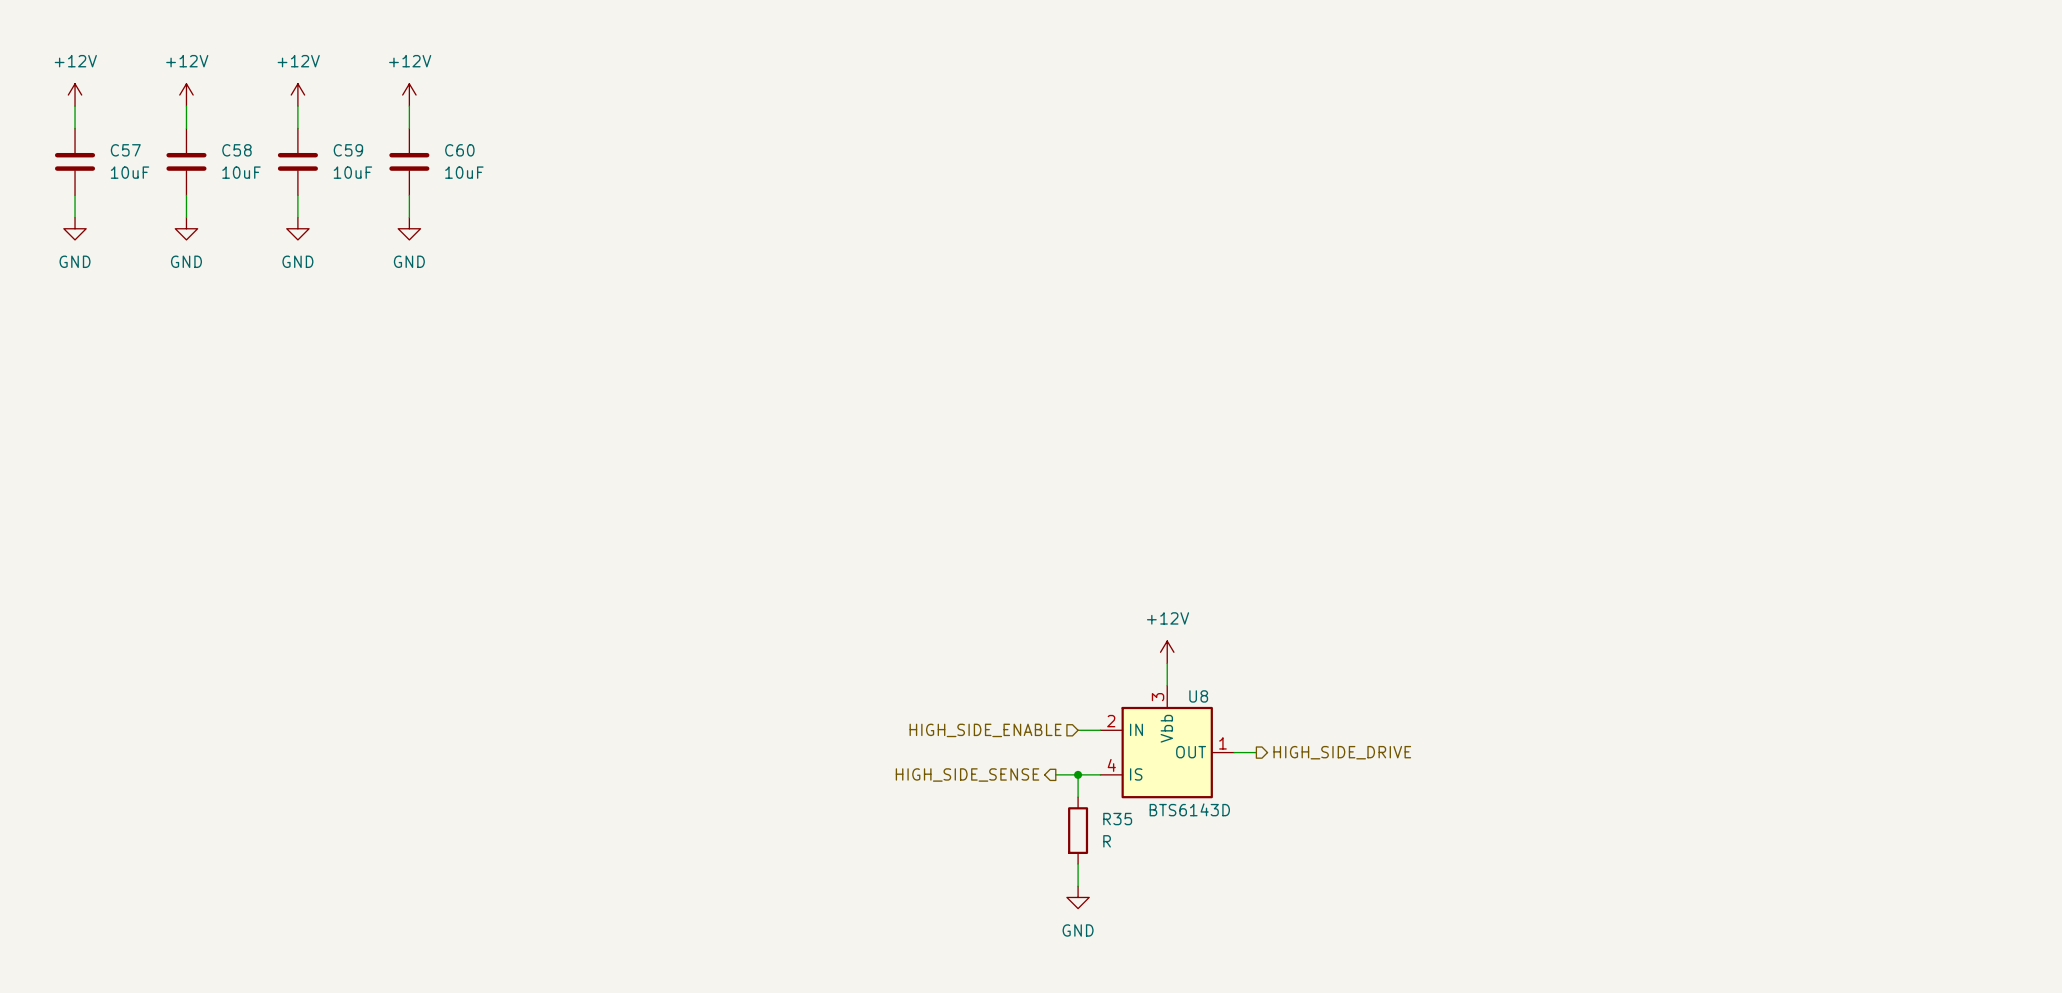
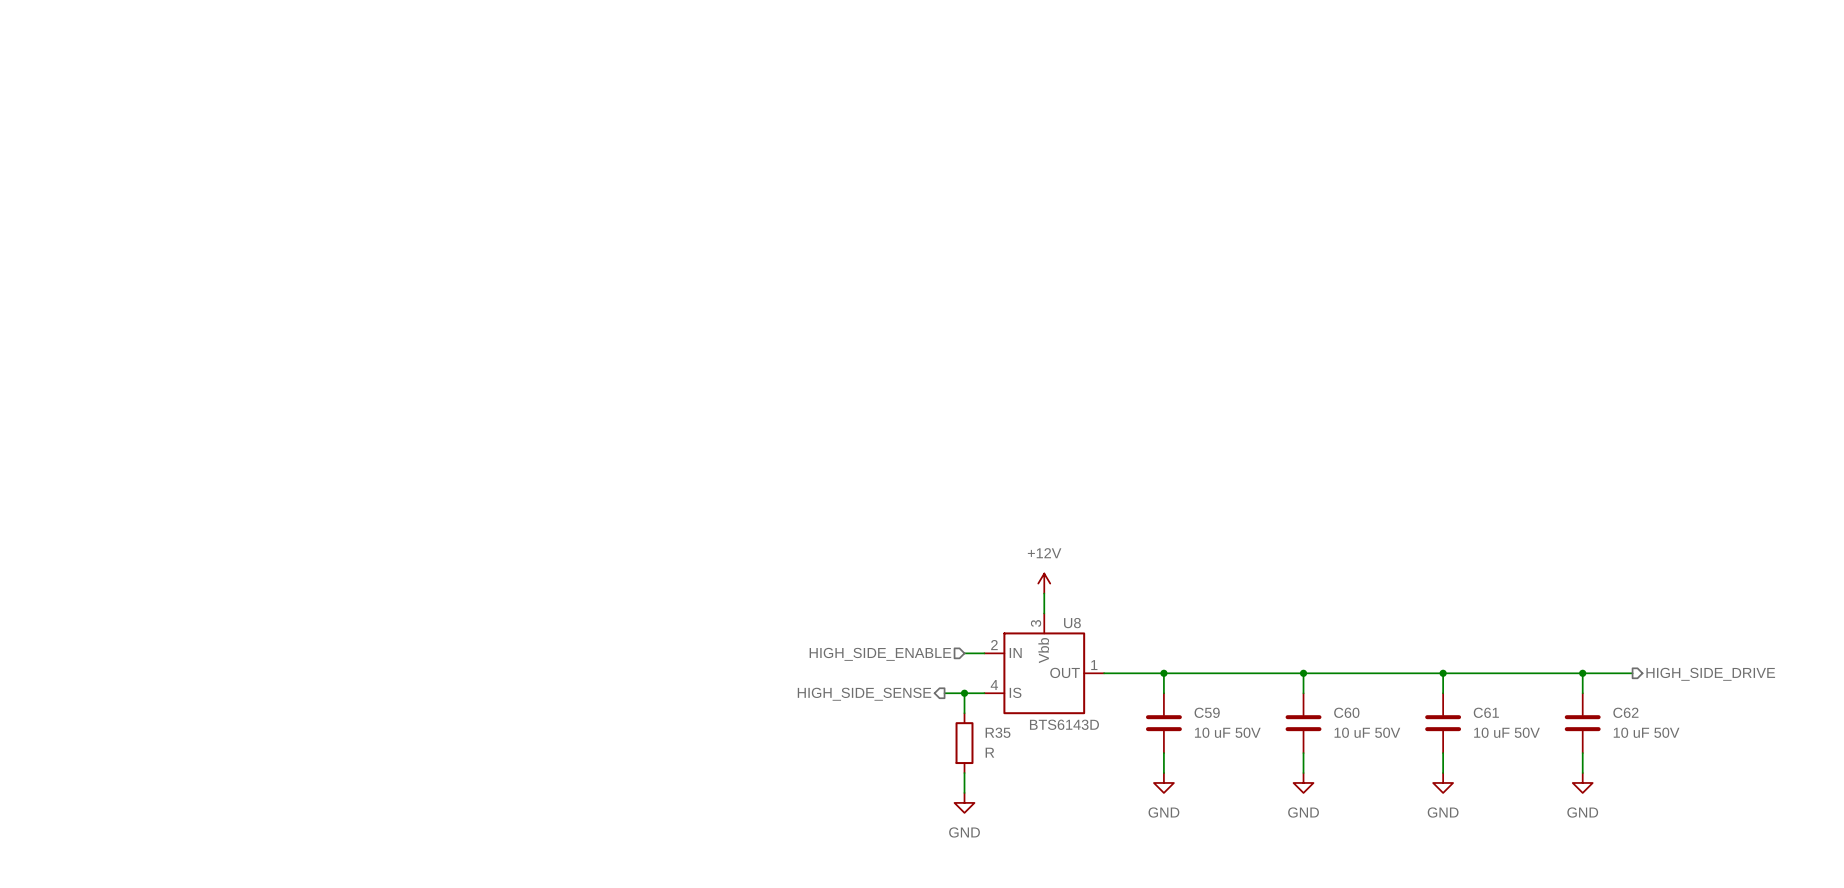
power symbol: +12V (75, 95) -> none
power symbol: +12V (186, 95) -> none
power symbol: +12V (297, 95) -> none
power symbol: +12V (409, 95) -> none
wire: (75, 106) (75, 128) -> none
wire: (186, 106) (186, 128) -> none
wire: (297, 106) (297, 128) -> none
wire: (409, 106) (409, 128) -> none
C57: 10uF (75, 161) -> none
C58: 10uF (186, 161) -> none
C59 position: (297, 161) -> (1163, 723)
C60 position: (409, 161) -> (1303, 723)
C59 value: 10uF (352, 172) -> 10 uF 50V (1227, 732)
C60 value: 10uF (464, 172) -> 10 uF 50V (1367, 732)
wire: (75, 195) (75, 217) -> none
wire: (186, 195) (186, 217) -> none
wire: (297, 195) (297, 217) -> none
wire: (409, 195) (409, 217) -> none
power symbol: GND (75, 228) -> none
power symbol: GND (186, 228) -> none
power symbol: GND (297, 228) -> none
power symbol: GND (409, 228) -> none
wire: none -> (1124, 673) (1632, 673)
wire: none -> (1163, 673) (1163, 693)
junction: none -> (1163, 673)
hierarchical label: HIGH_SIDE_DRIVE (1342, 752) -> none
wire: none -> (1303, 673) (1303, 693)
junction: none -> (1303, 673)
wire: none -> (1443, 673) (1443, 693)
junction: none -> (1443, 673)
wire: none -> (1582, 673) (1582, 693)
junction: none -> (1582, 673)
hierarchical label: none -> HIGH_SIDE_DRIVE (1710, 674)
C61: none -> 10 uF 50V (1443, 723)
C62: none -> 10 uF 50V (1582, 723)
wire: none -> (1163, 753) (1163, 773)
wire: none -> (1303, 753) (1303, 773)
wire: none -> (1443, 753) (1443, 773)
wire: none -> (1582, 753) (1582, 773)
power symbol: none -> GND (1163, 782)
power symbol: none -> GND (1303, 782)
power symbol: none -> GND (1443, 782)
power symbol: none -> GND (1582, 782)

